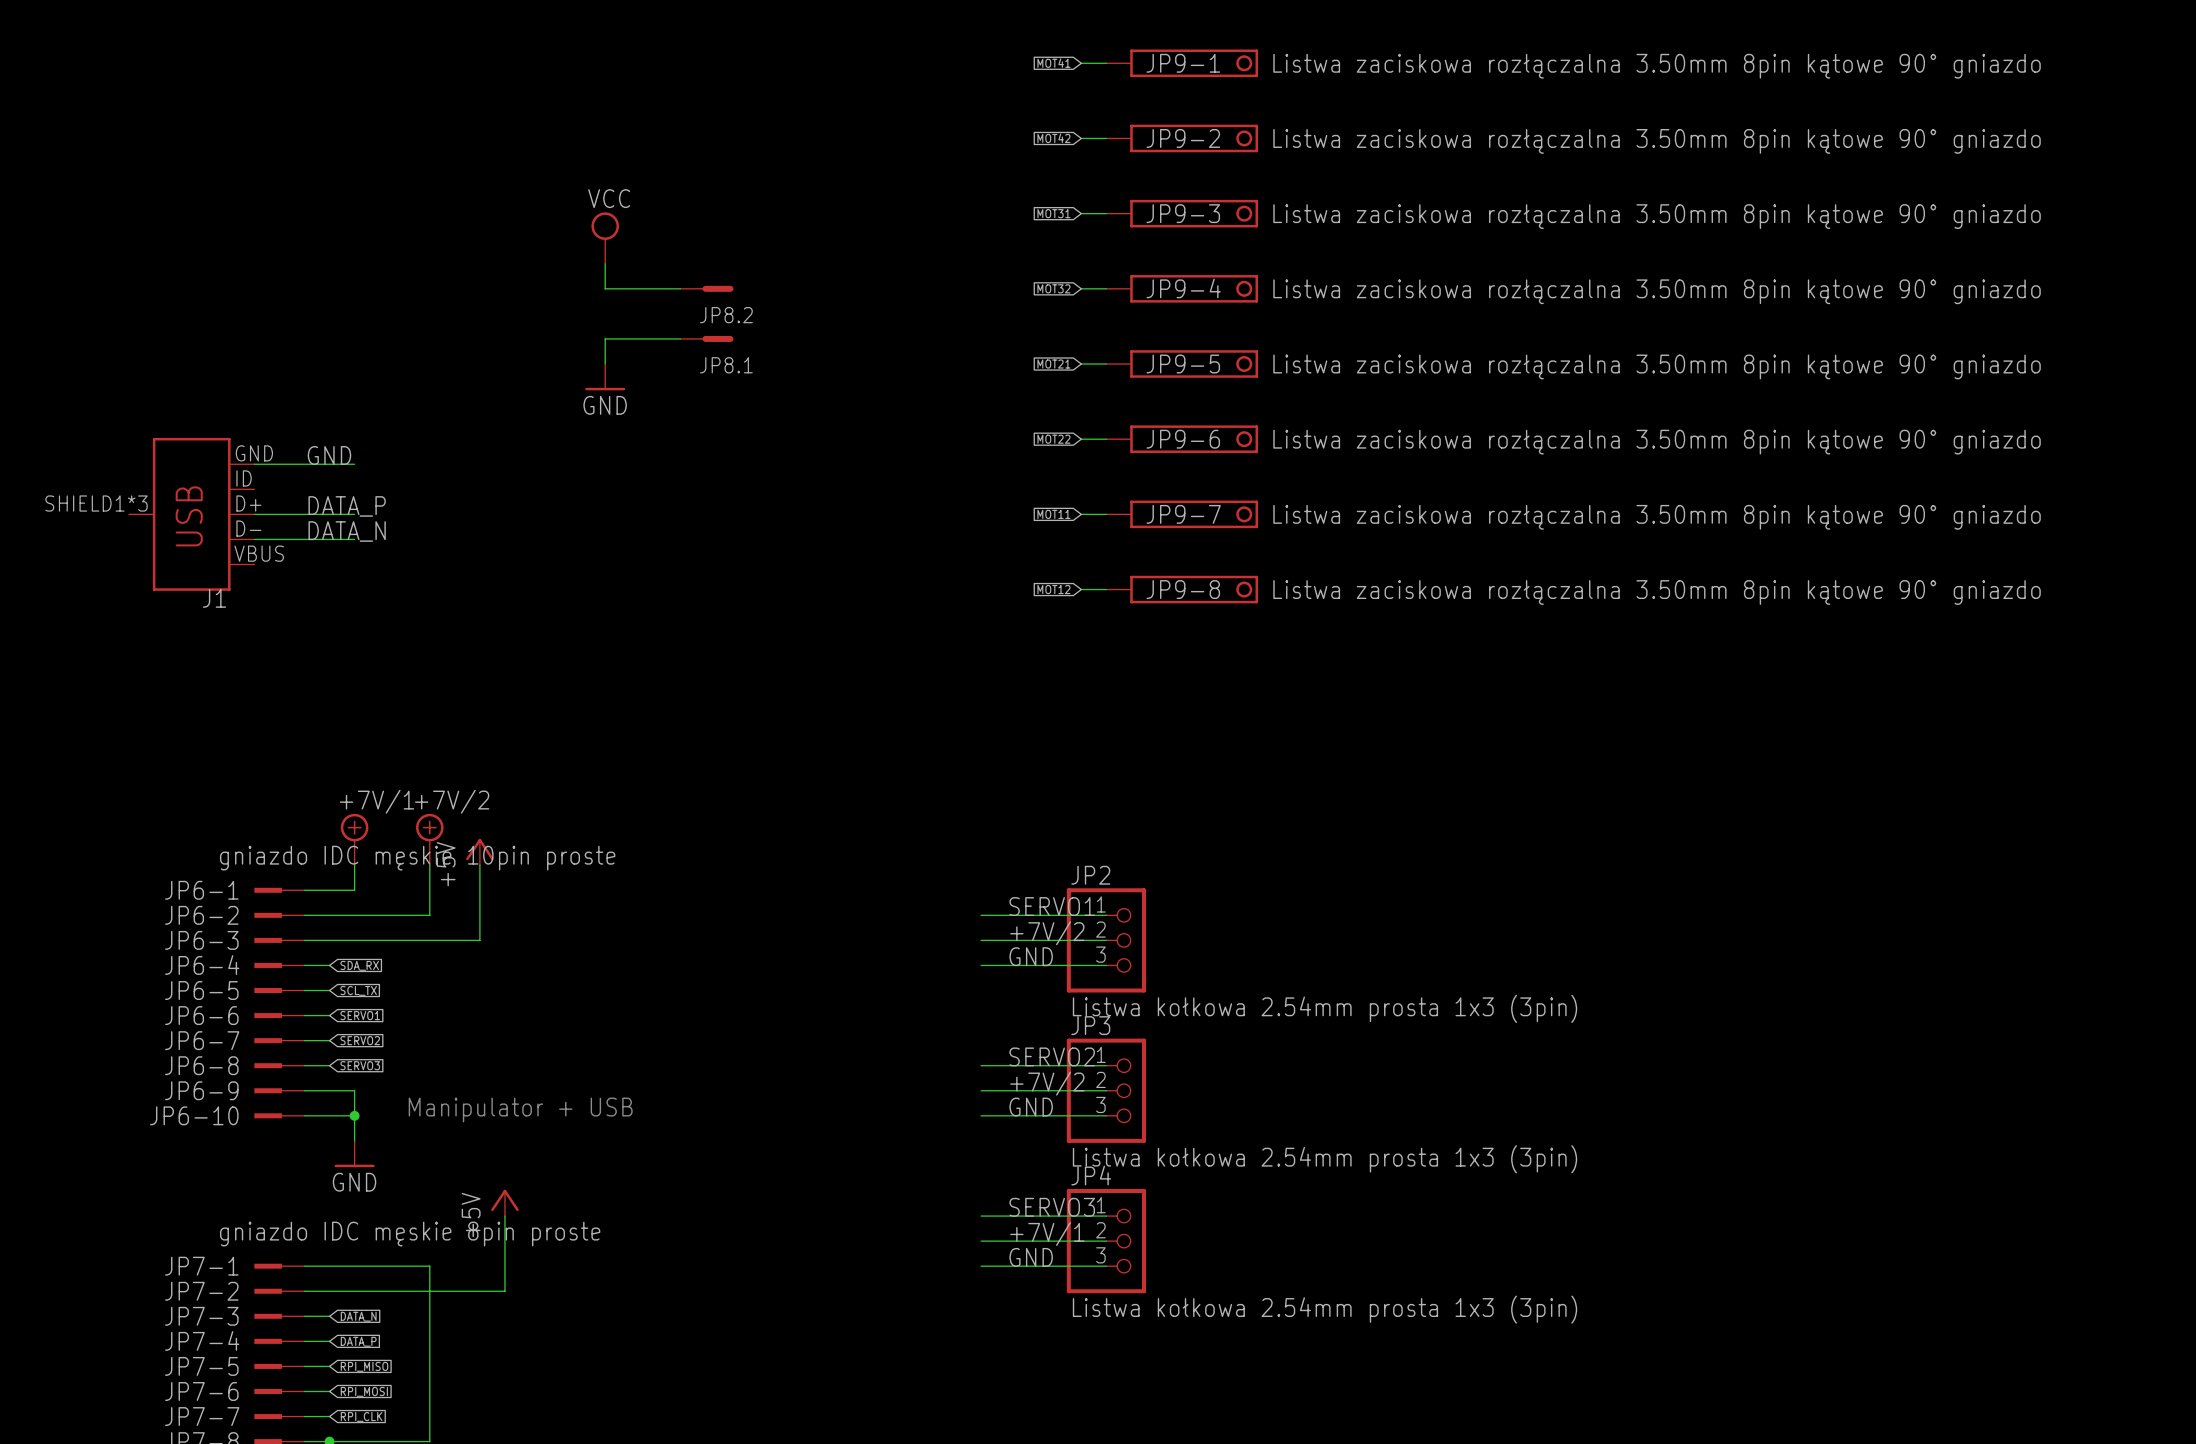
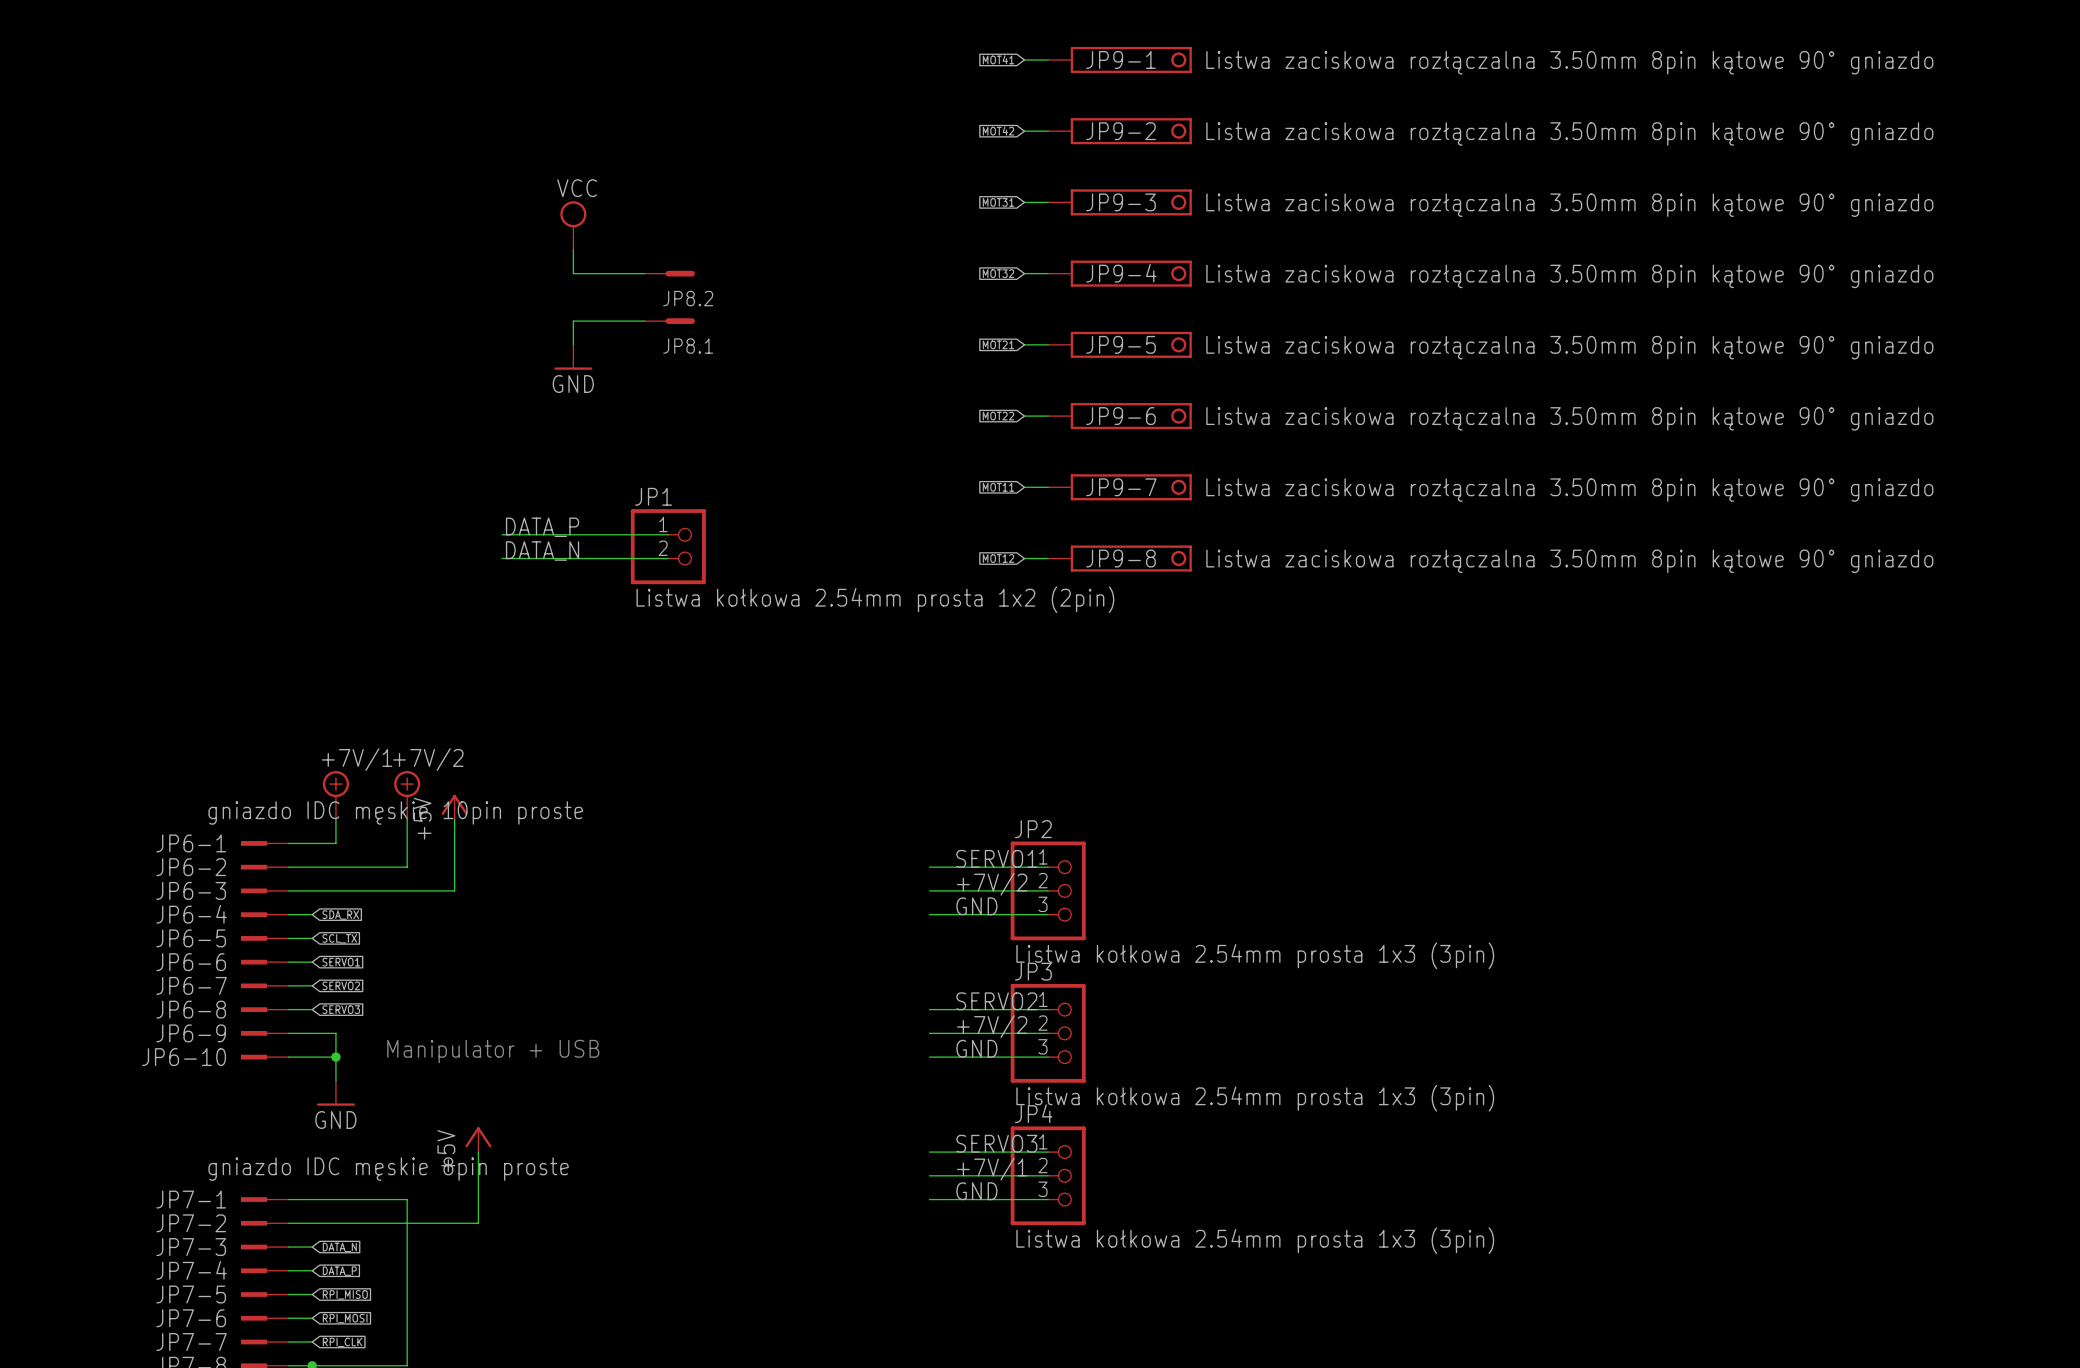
label: GND (329, 455) -> none
wire: (254, 464) (354, 464) -> none
label position: DATA_P (347, 506) -> DATA_P (542, 527)
J1: (191, 514) -> none
wire: (254, 514) (354, 514) -> none
label position: DATA_N (347, 531) -> DATA_N (542, 551)
wire: (254, 539) (354, 539) -> none
wire: none -> (502, 534) (668, 534)
JP1: none -> Listwa kołkowa 2.54mm prosta 1x2 (2pin) (668, 546)
wire: none -> (502, 558) (668, 558)

